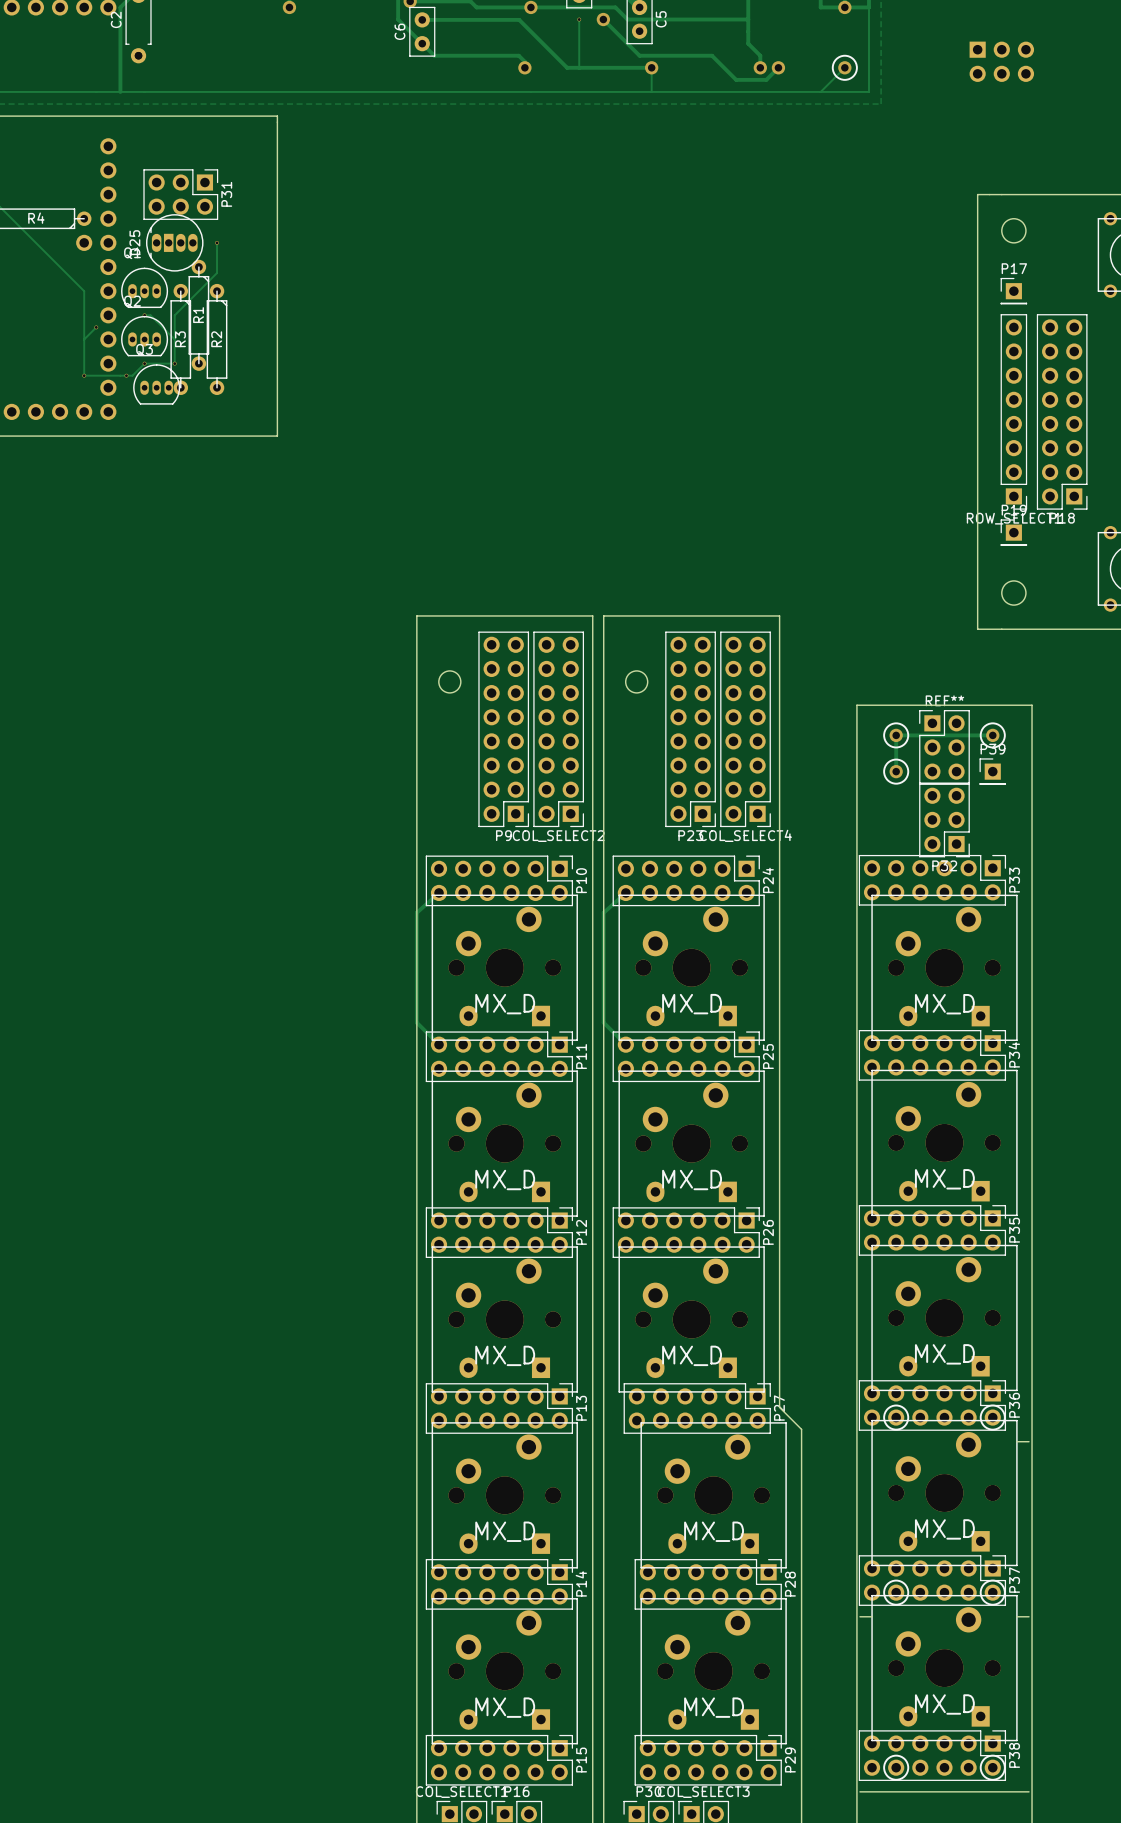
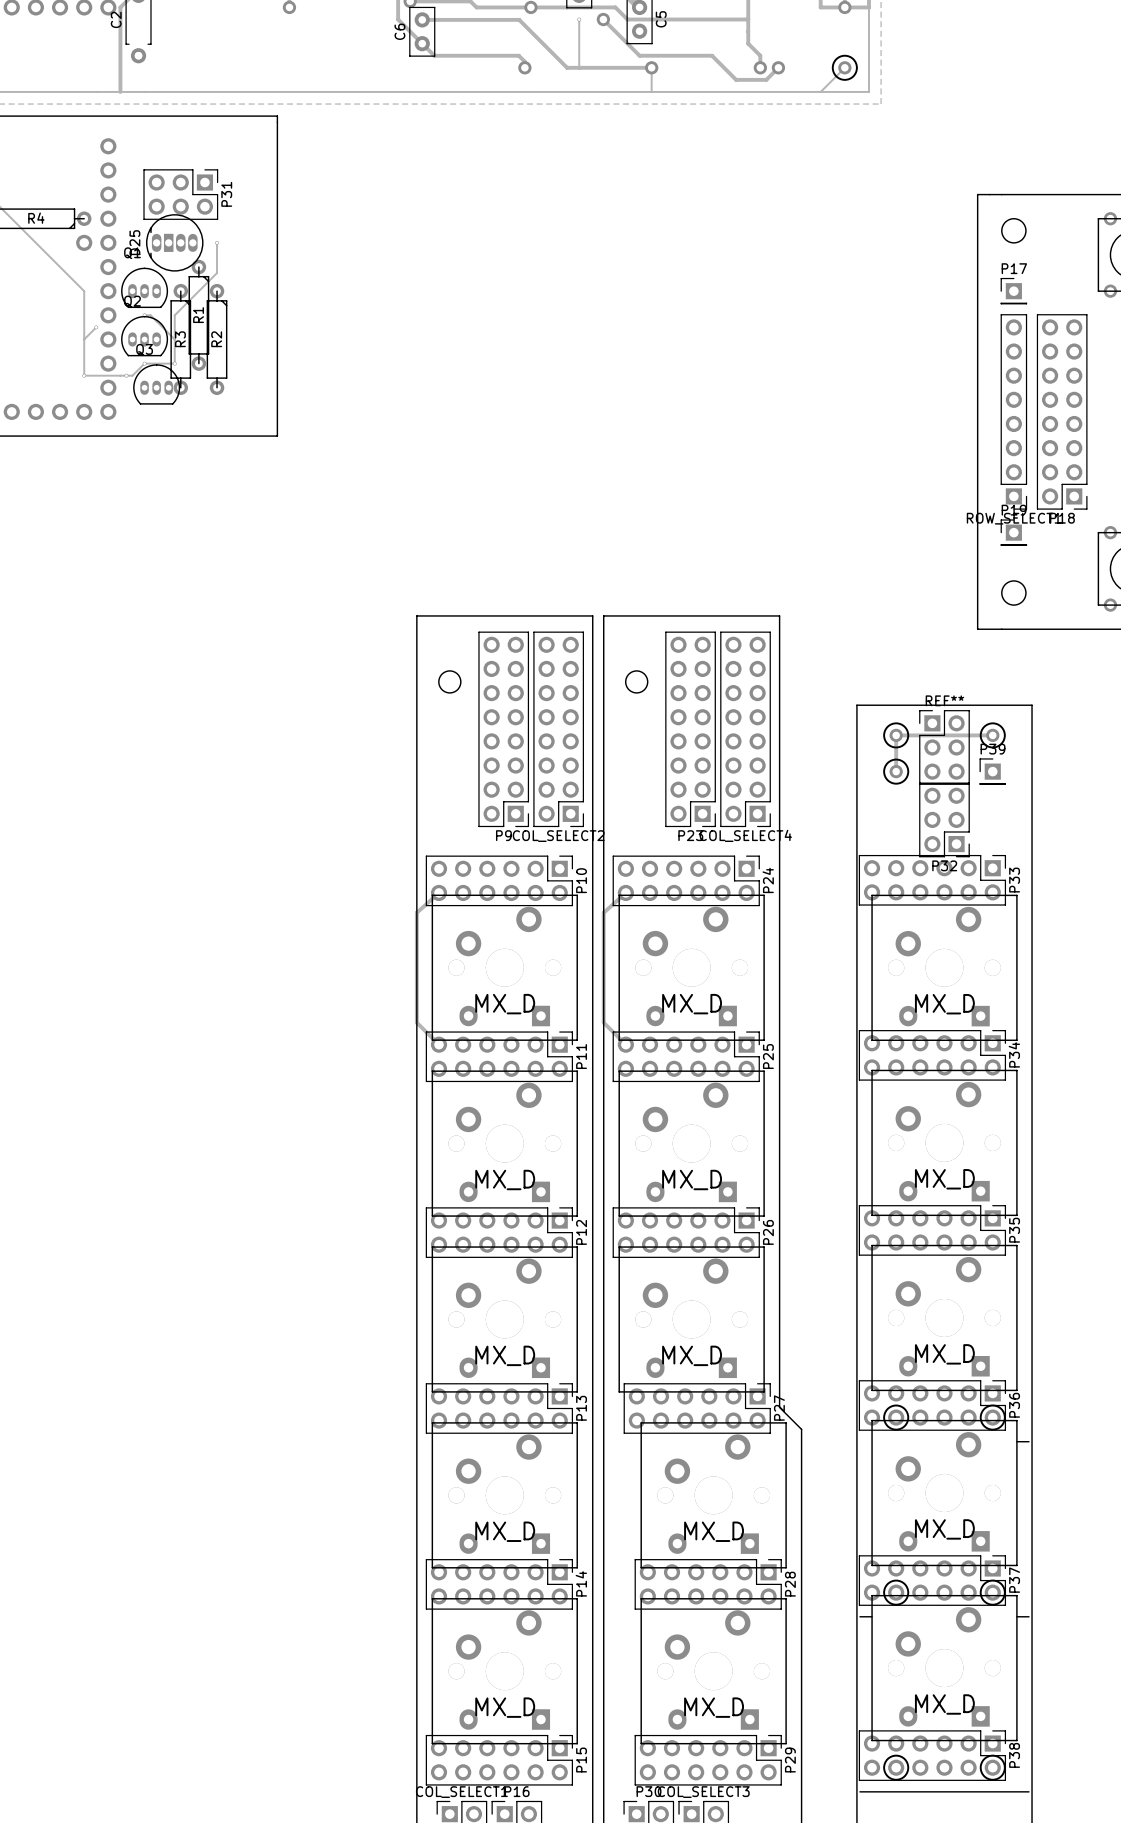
part: (1001, 61) -> none

